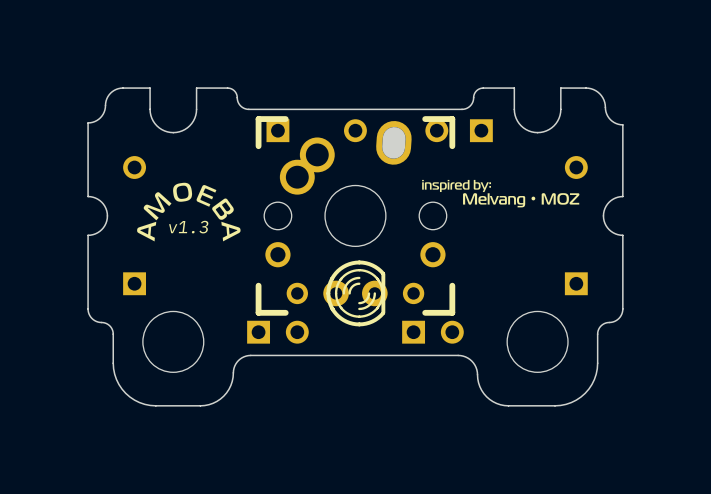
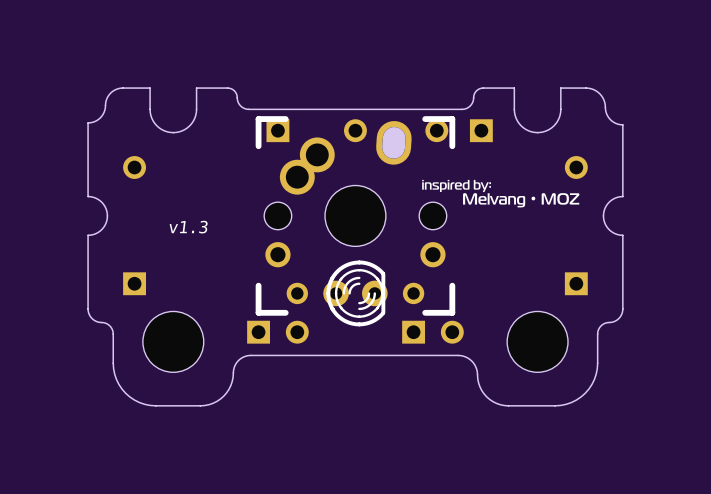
drawing: [137, 182, 241, 242] -> none

